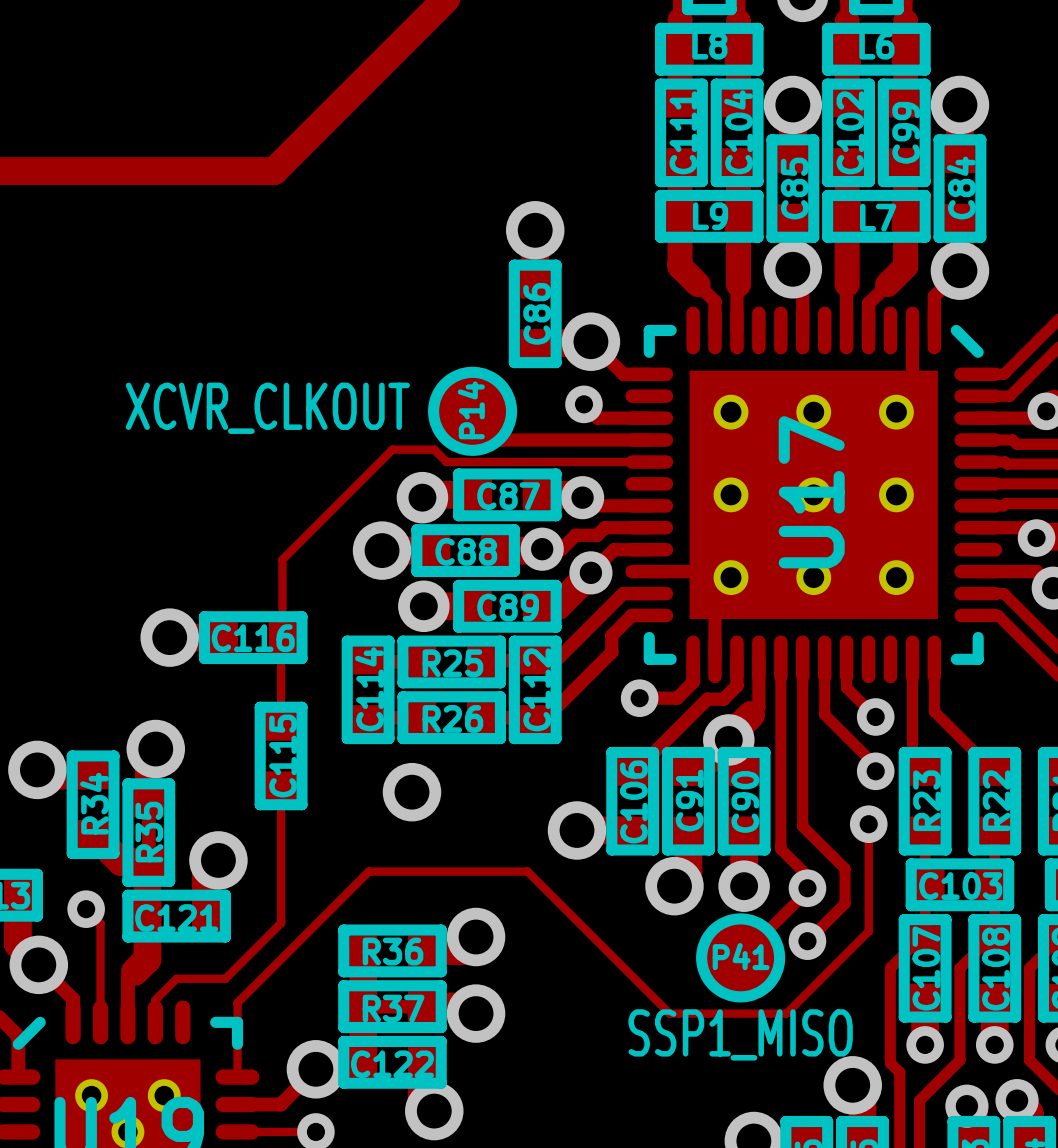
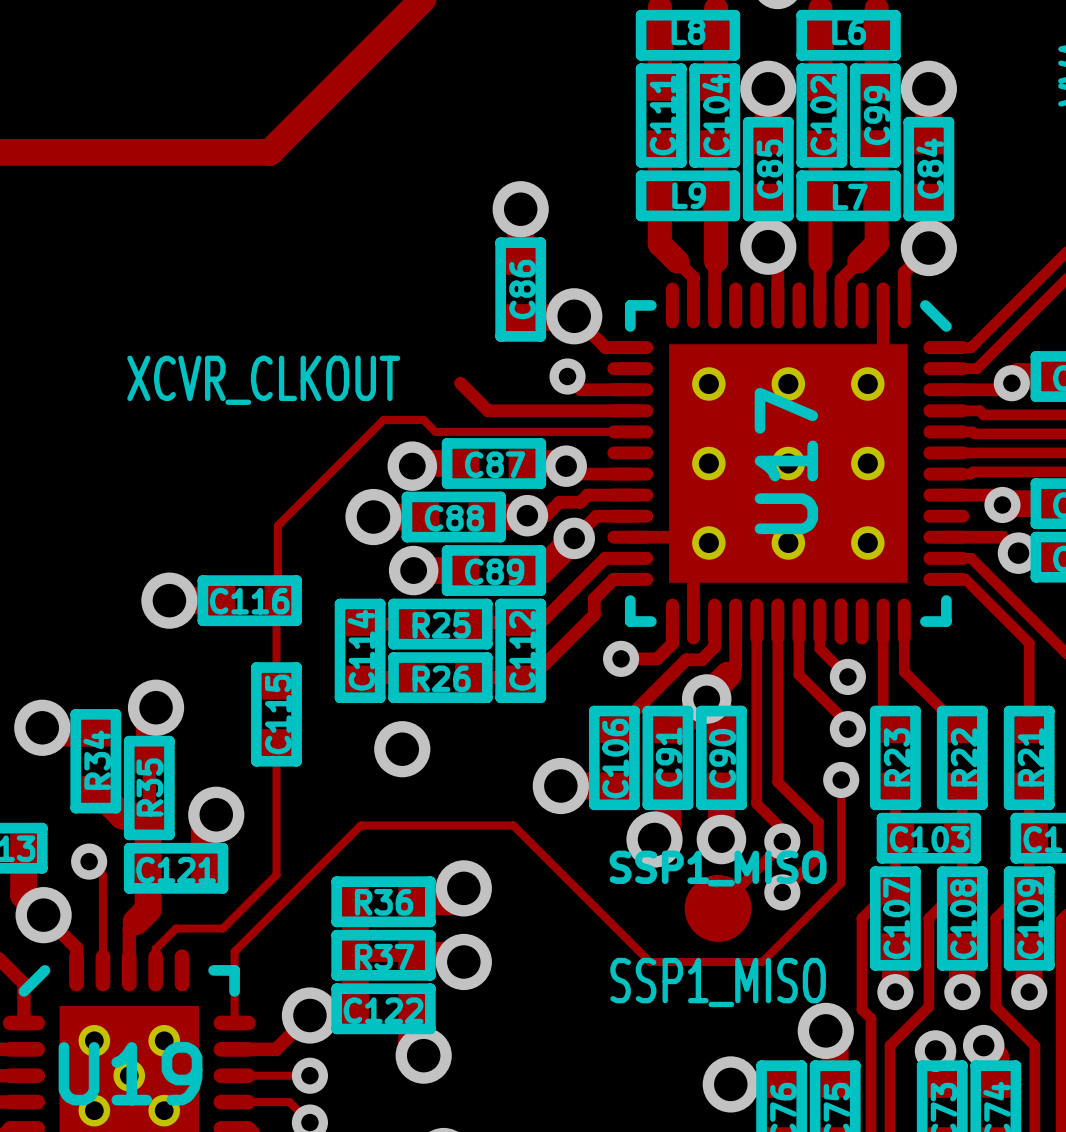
P14: (472, 411) -> none
P41: (740, 957) -> none
part: none -> SSP1_MISO (718, 908)

